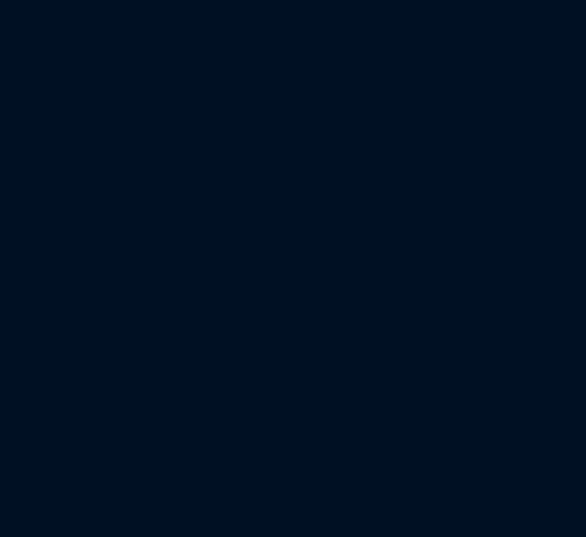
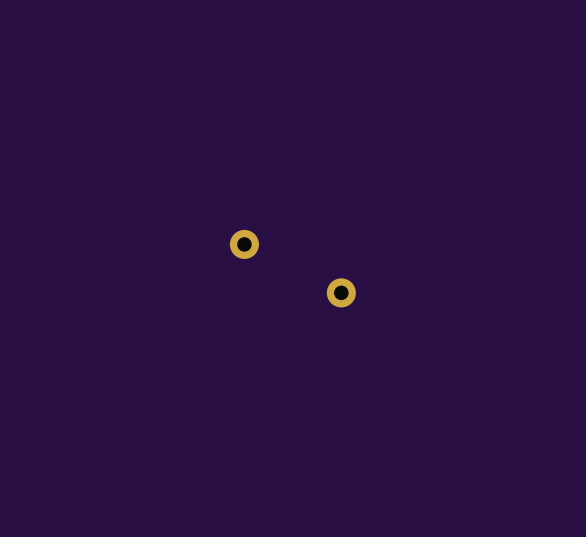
via: none -> (244, 244)
via: none -> (341, 292)

